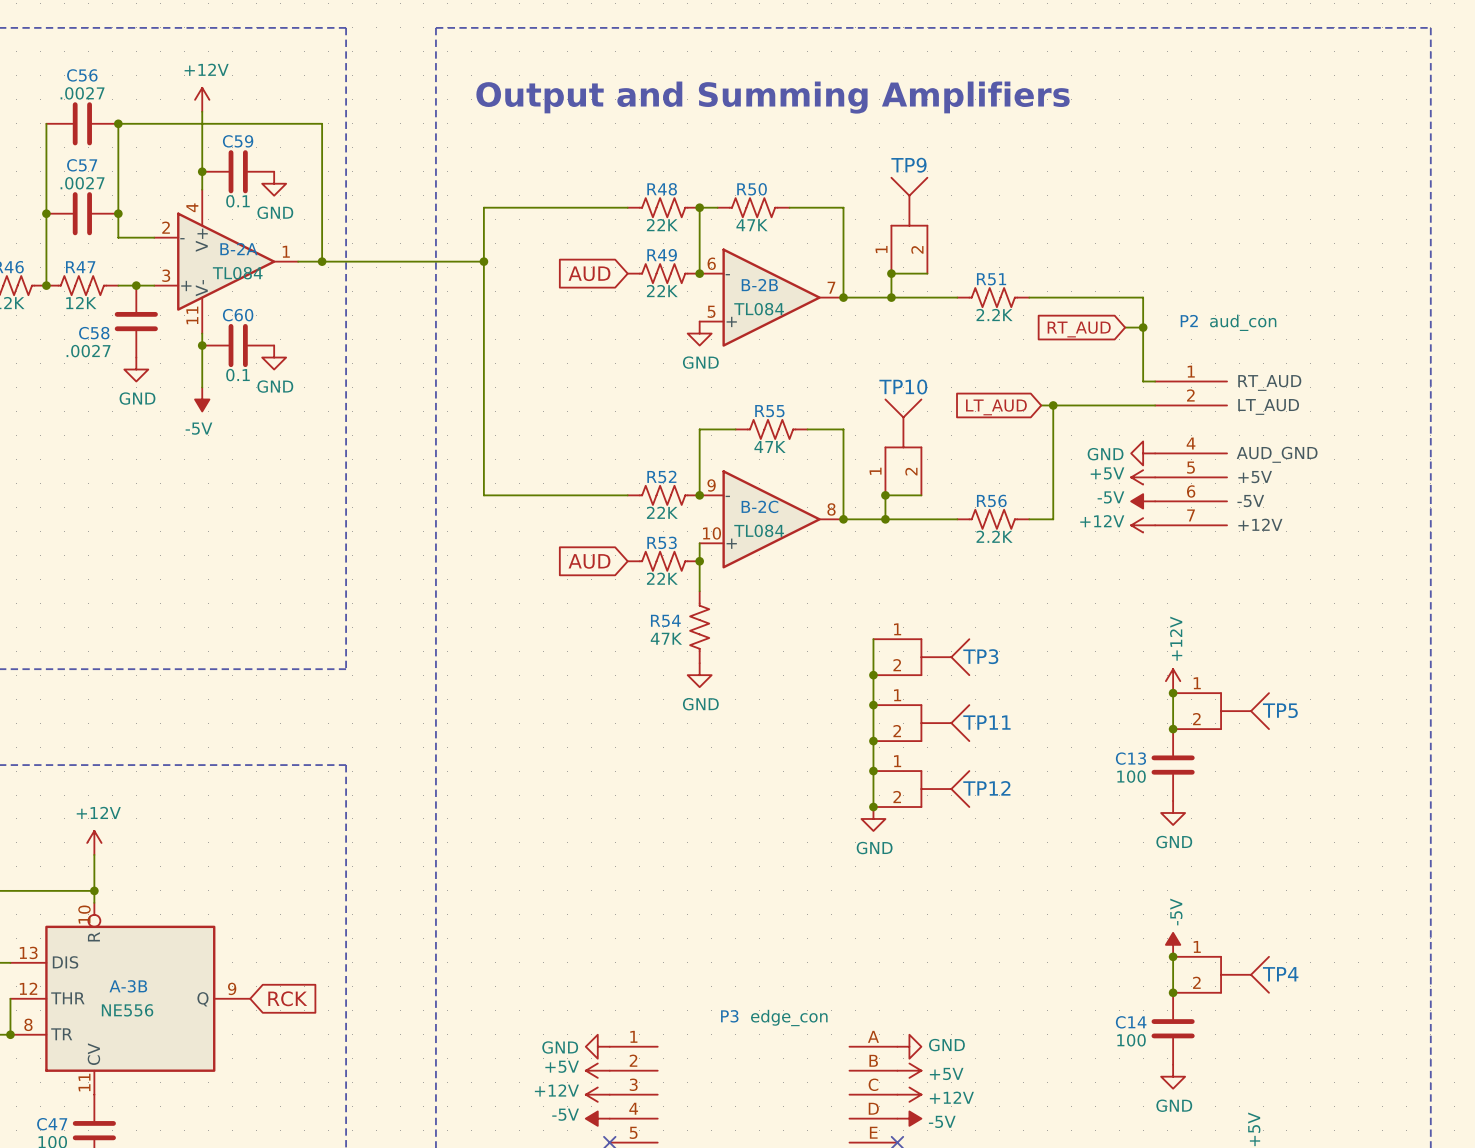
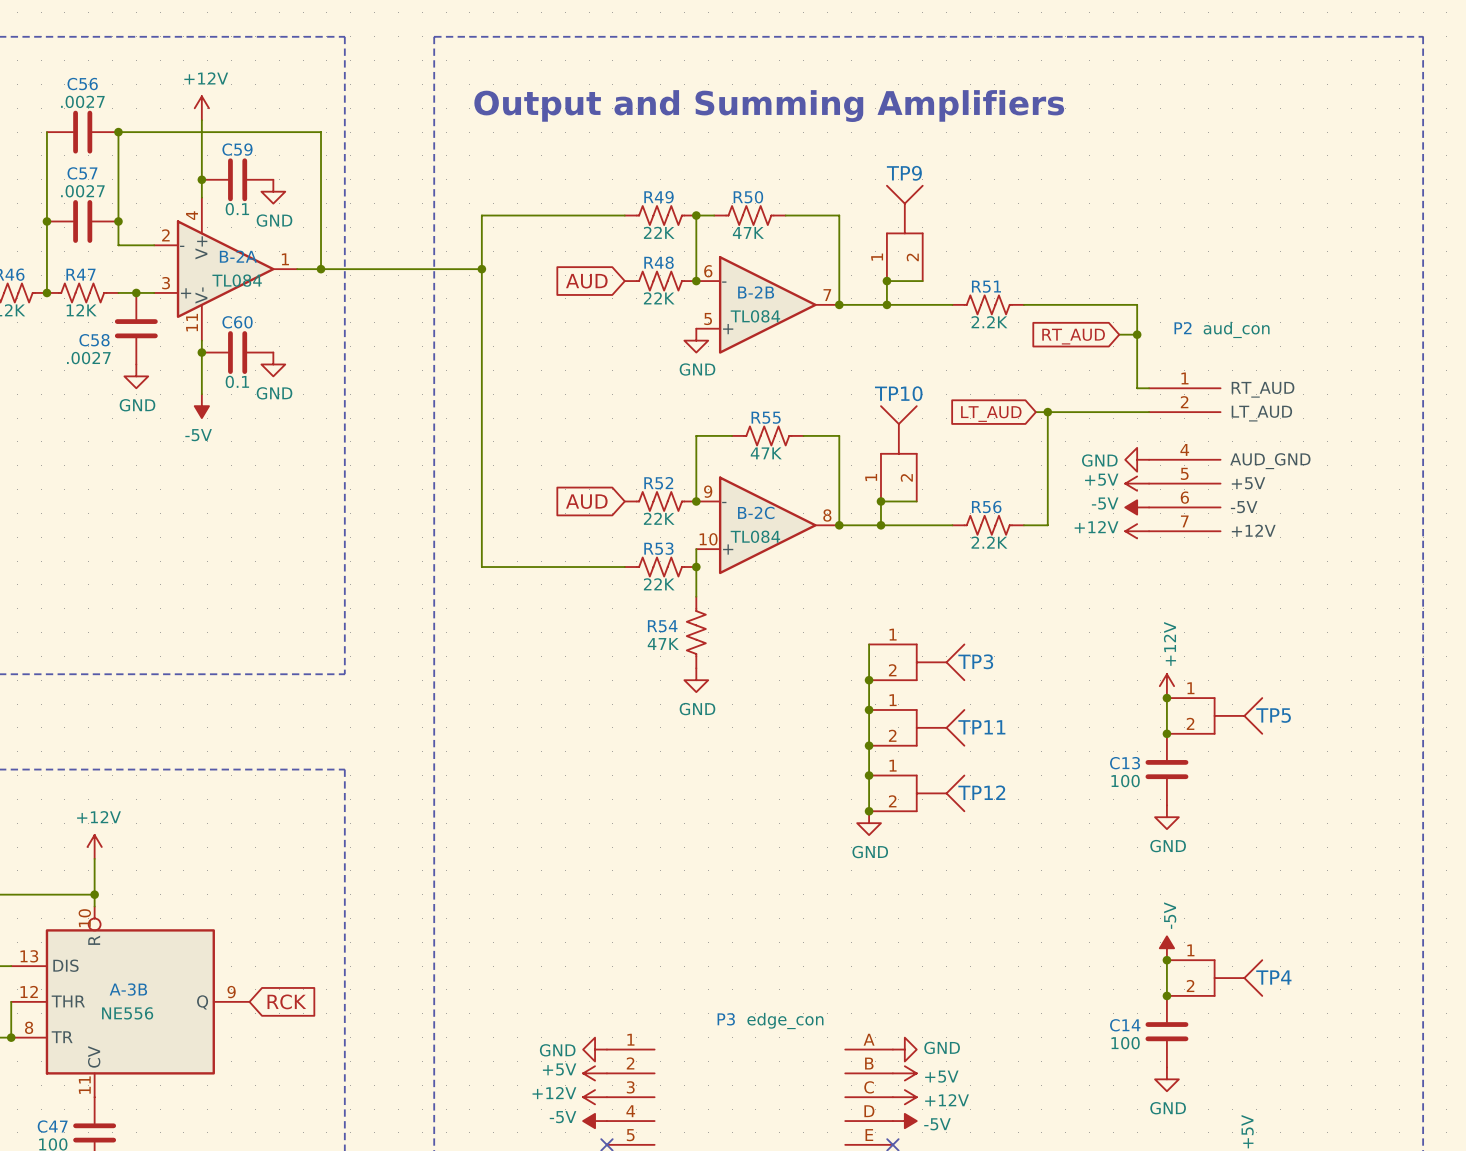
R48 name: R48 (662, 189) -> R49 (659, 197)
R49 name: R49 (662, 255) -> R48 (659, 262)
wire: (483, 495) (627, 495) -> (481, 501) (481, 567) (624, 567)
global label position: AUD (589, 561) -> AUD (586, 501)

